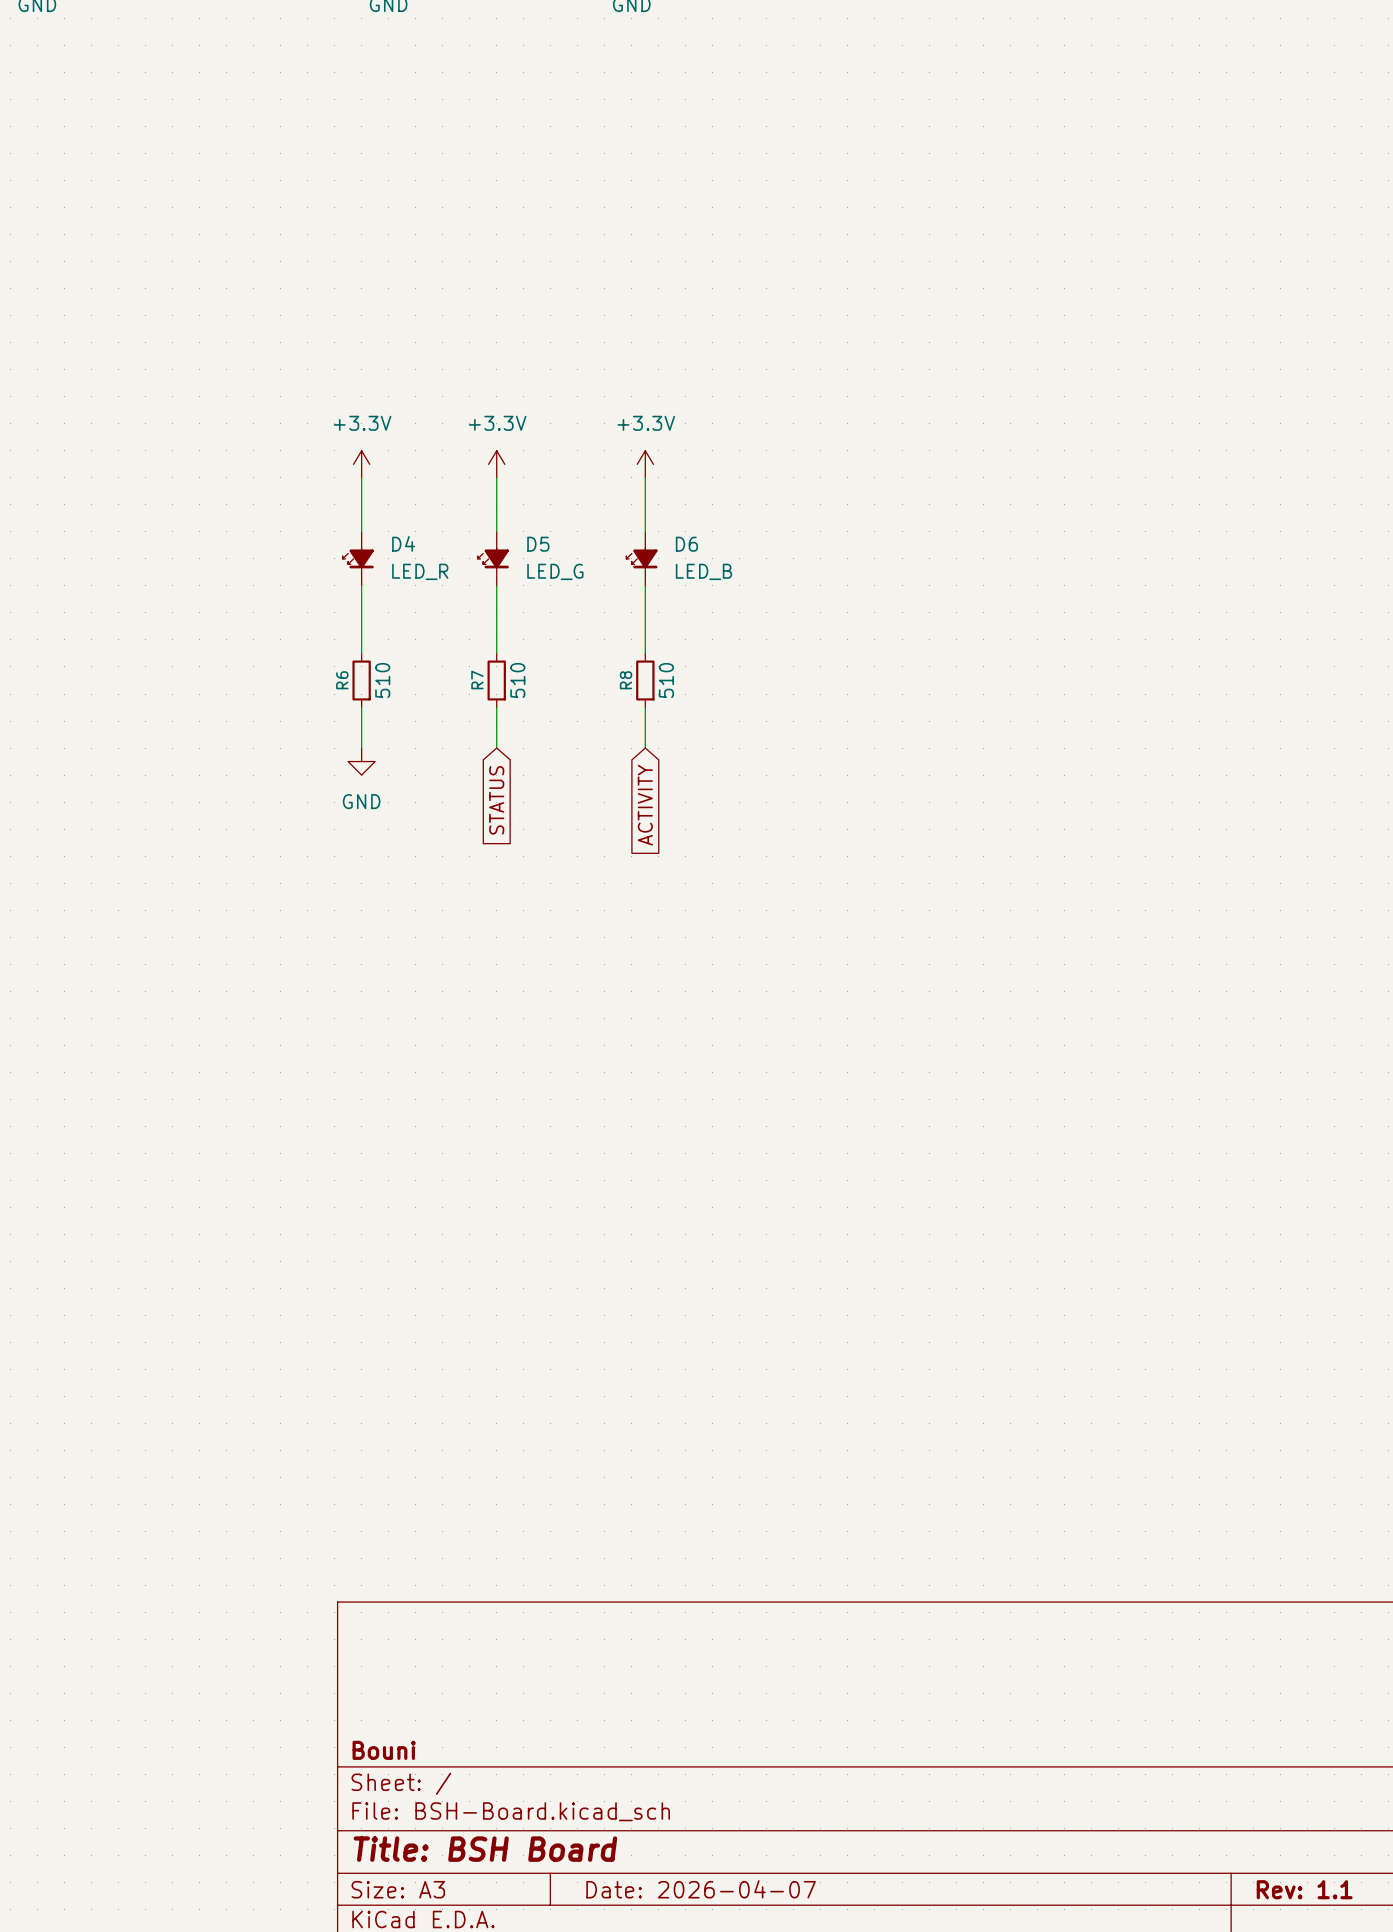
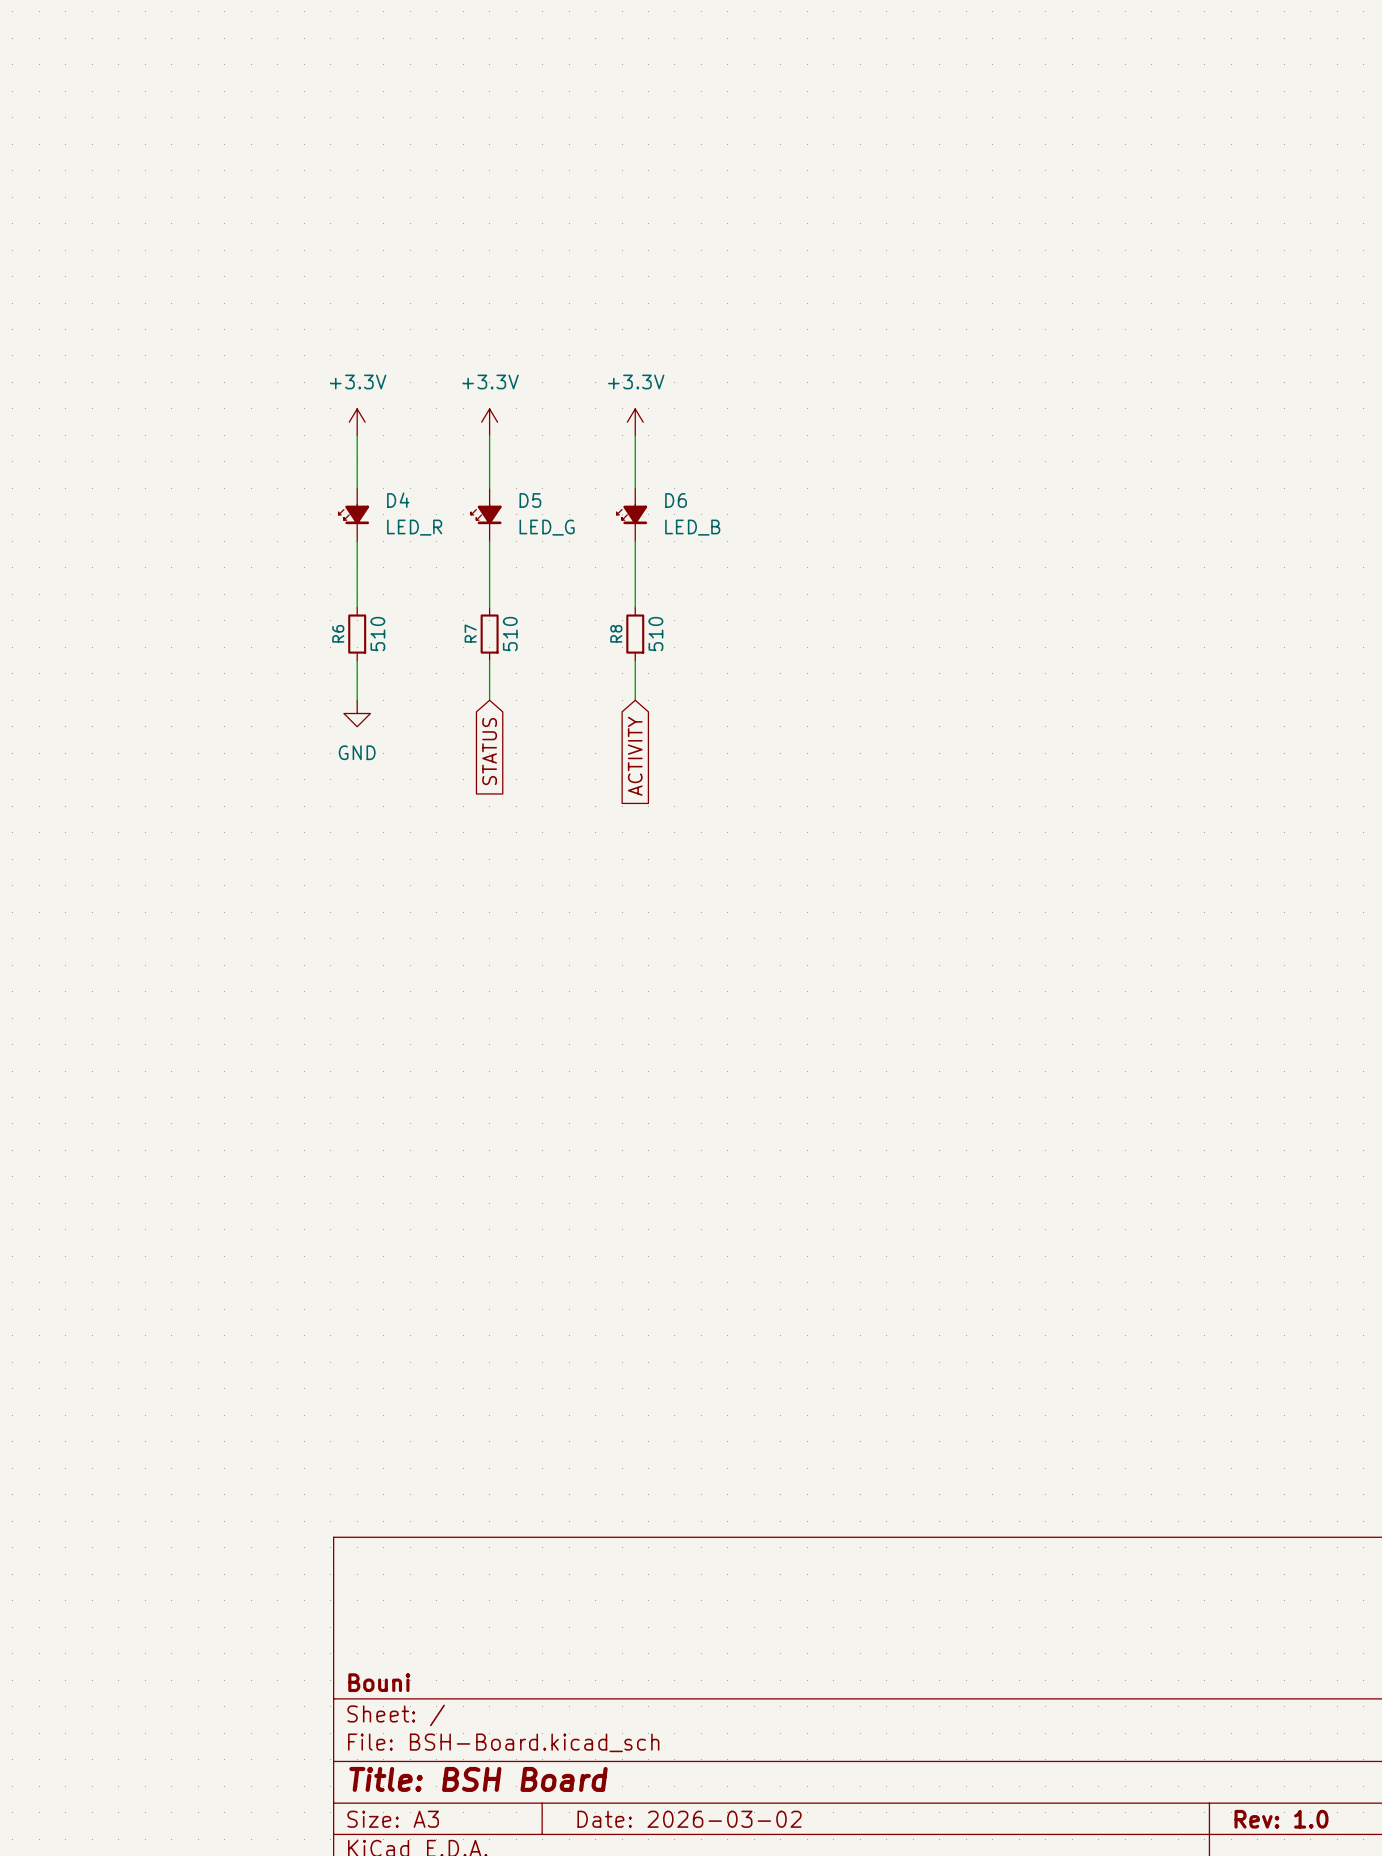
title block: Date: 2026-04-07 (701, 1889) -> Date: 2026-03-02 (689, 1819)
title block: Rev: 1.1 (1304, 1889) -> Rev: 1.0 (1281, 1819)

